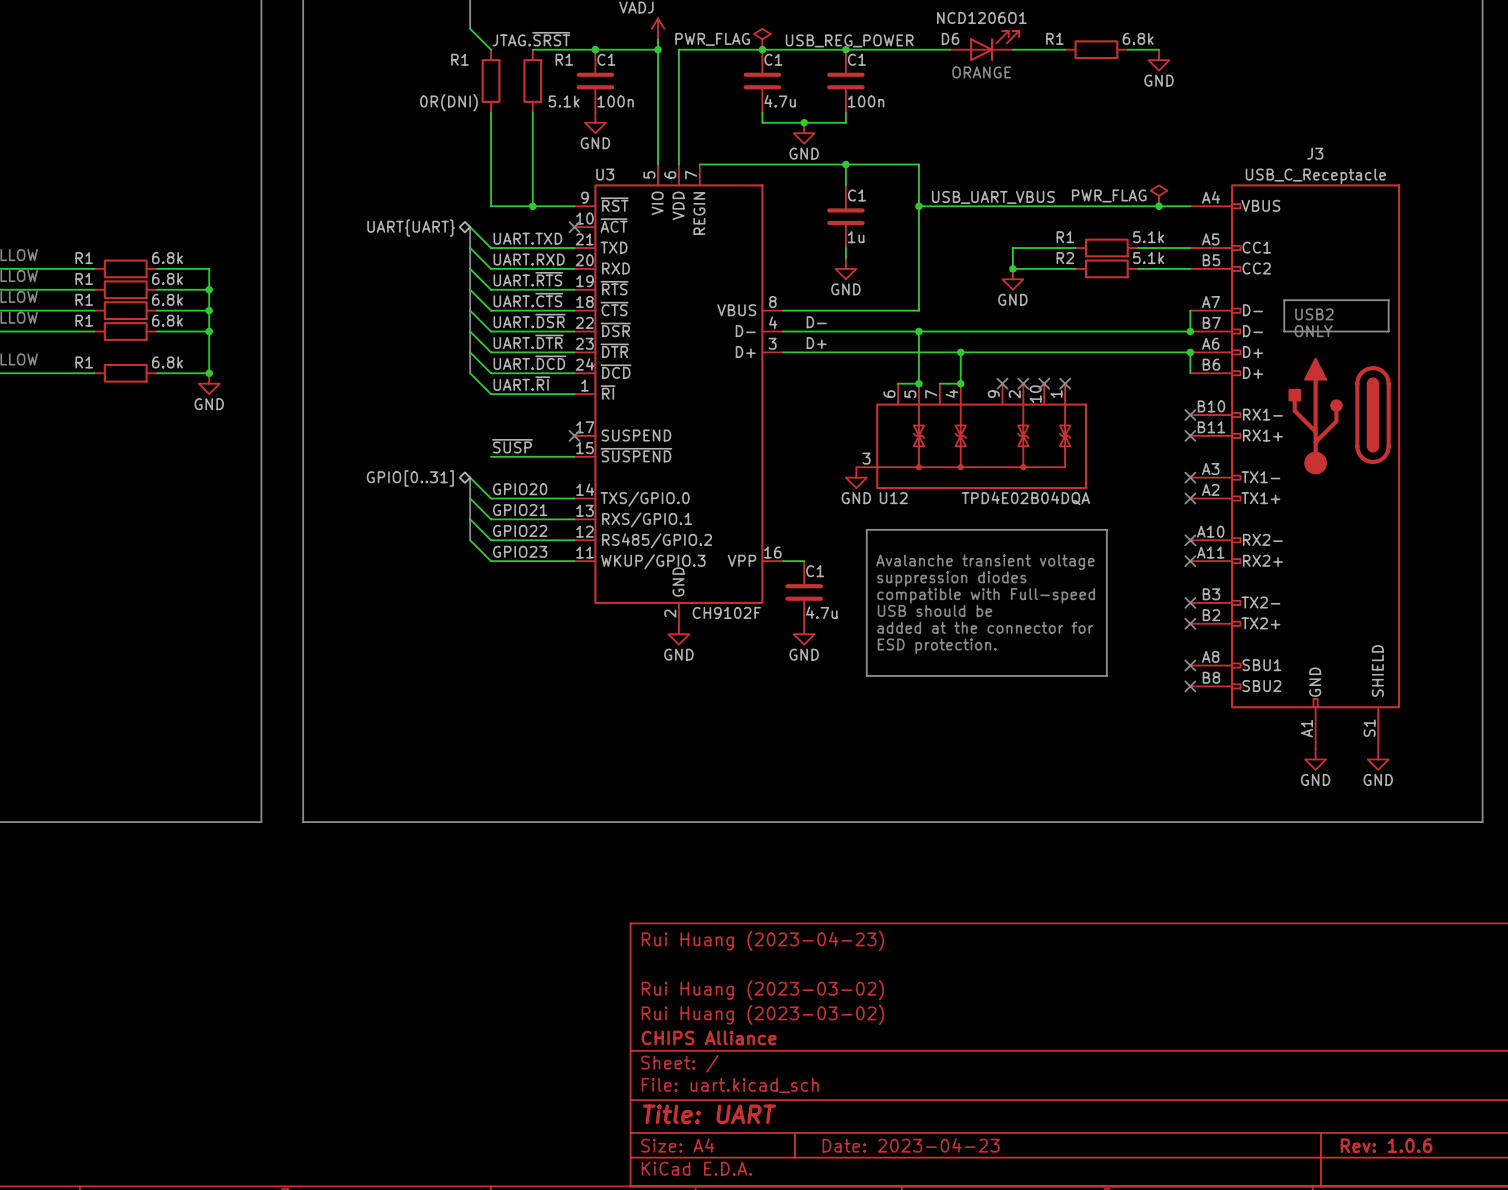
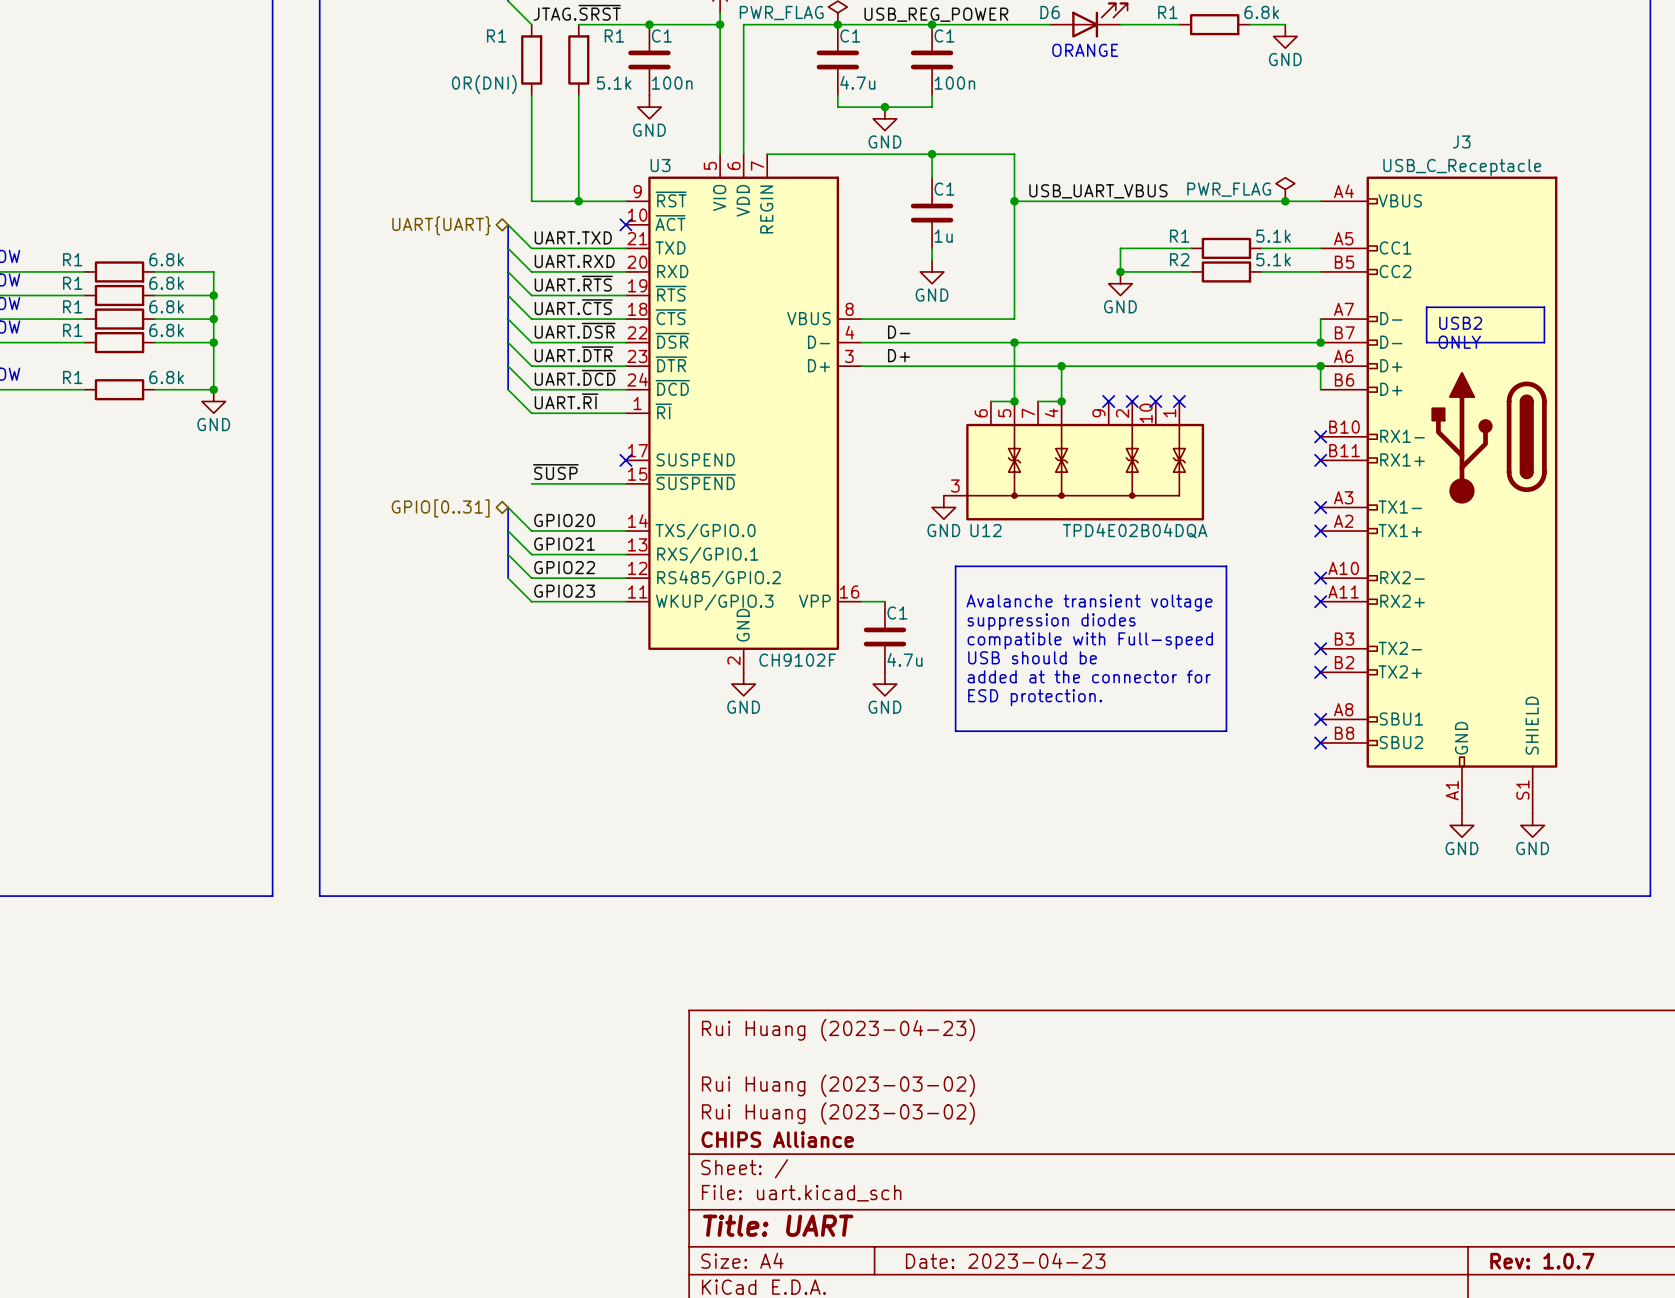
title block: Rev: 1.0.6 (1386, 1145) -> Rev: 1.0.7 (1542, 1261)

